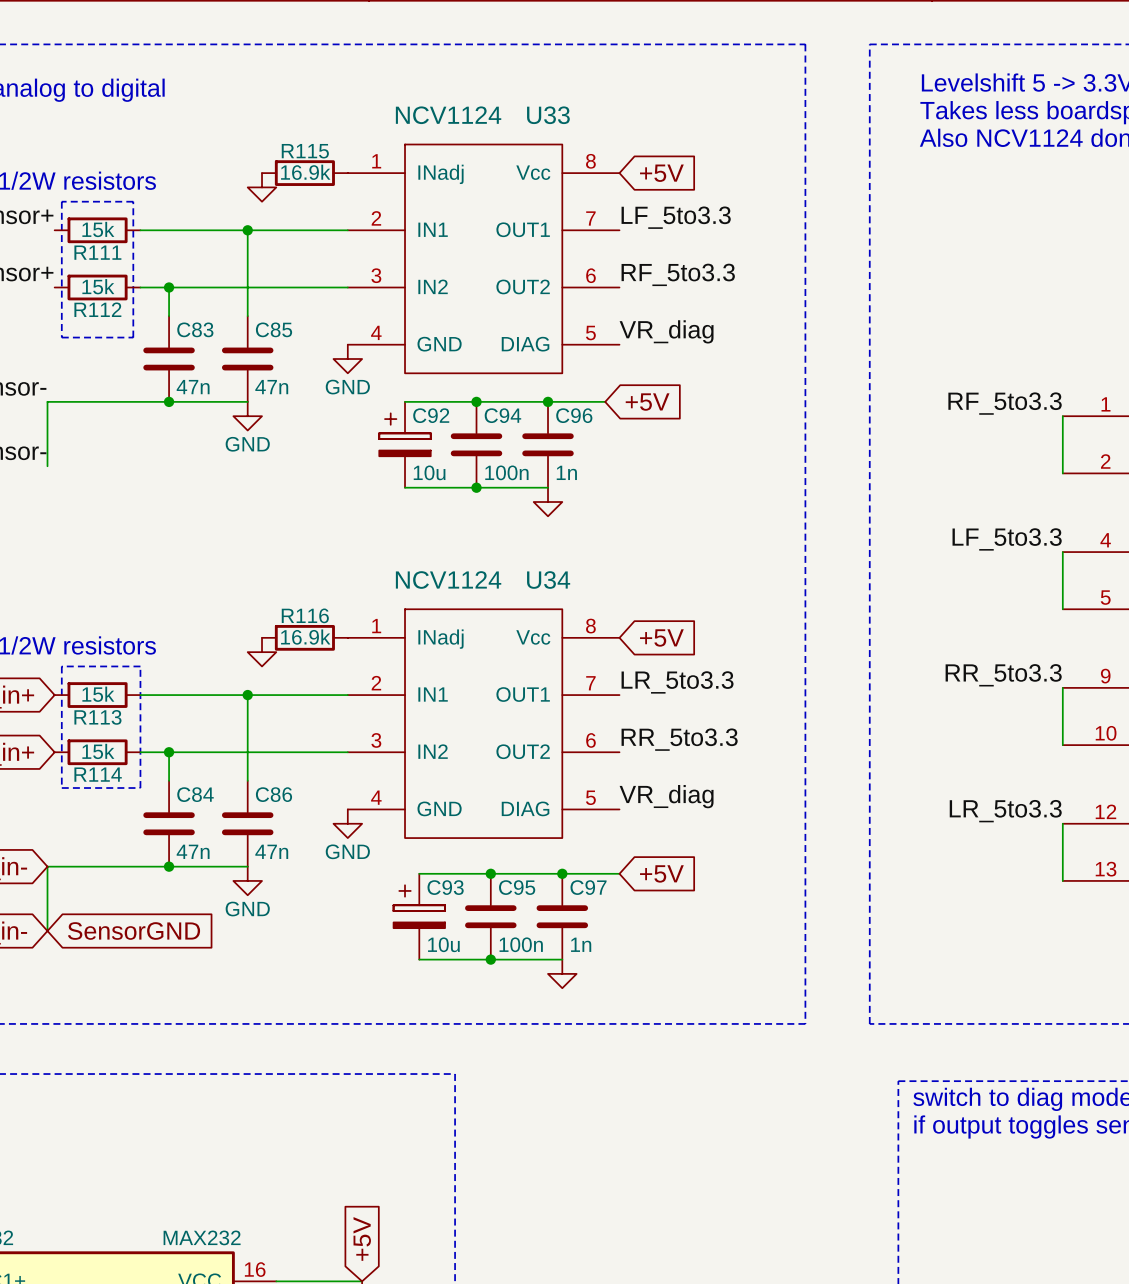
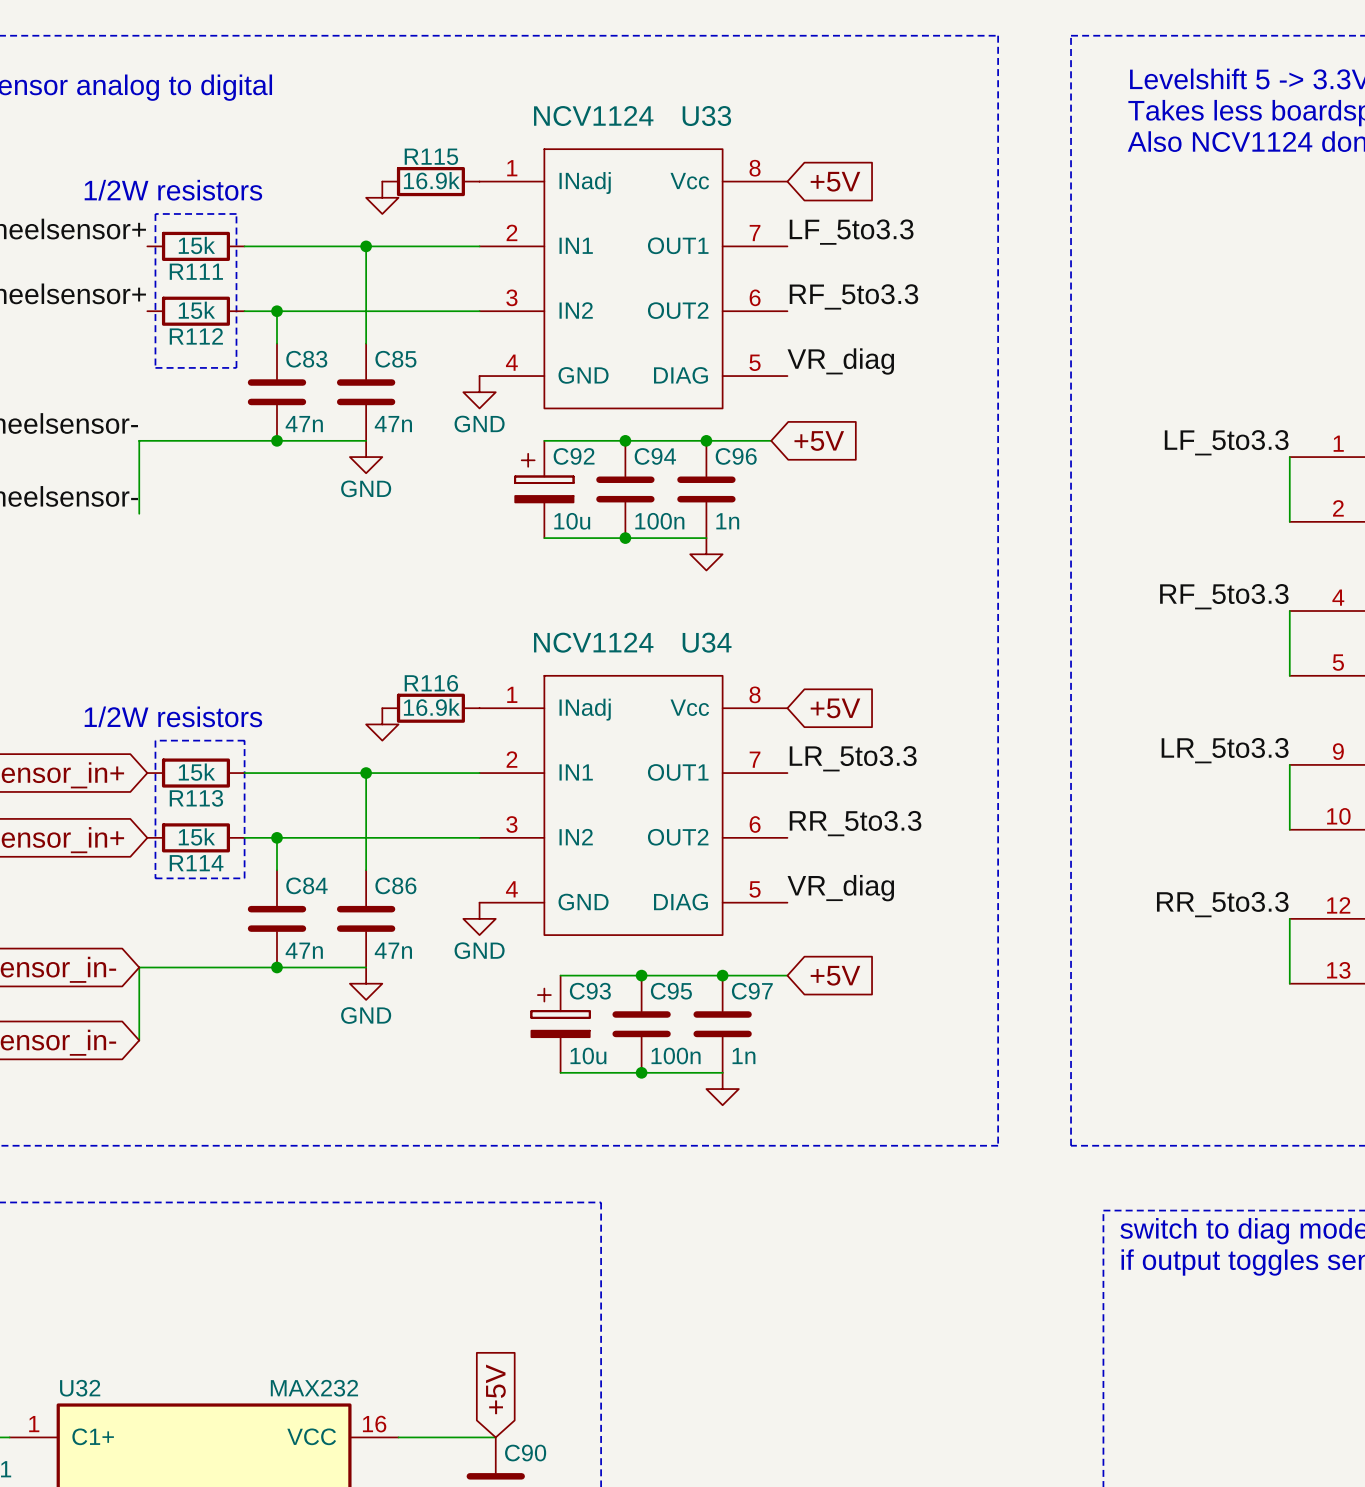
label: RF_5to3.3 (1005, 403) -> LF_5to3.3 (1226, 442)
label: LF_5to3.3 (1007, 539) -> RF_5to3.3 (1224, 596)
label: RR_5to3.3 (1003, 675) -> LR_5to3.3 (1225, 750)
label: LR_5to3.3 (1005, 811) -> RR_5to3.3 (1222, 904)
global label: SensorGND (134, 931) -> none

